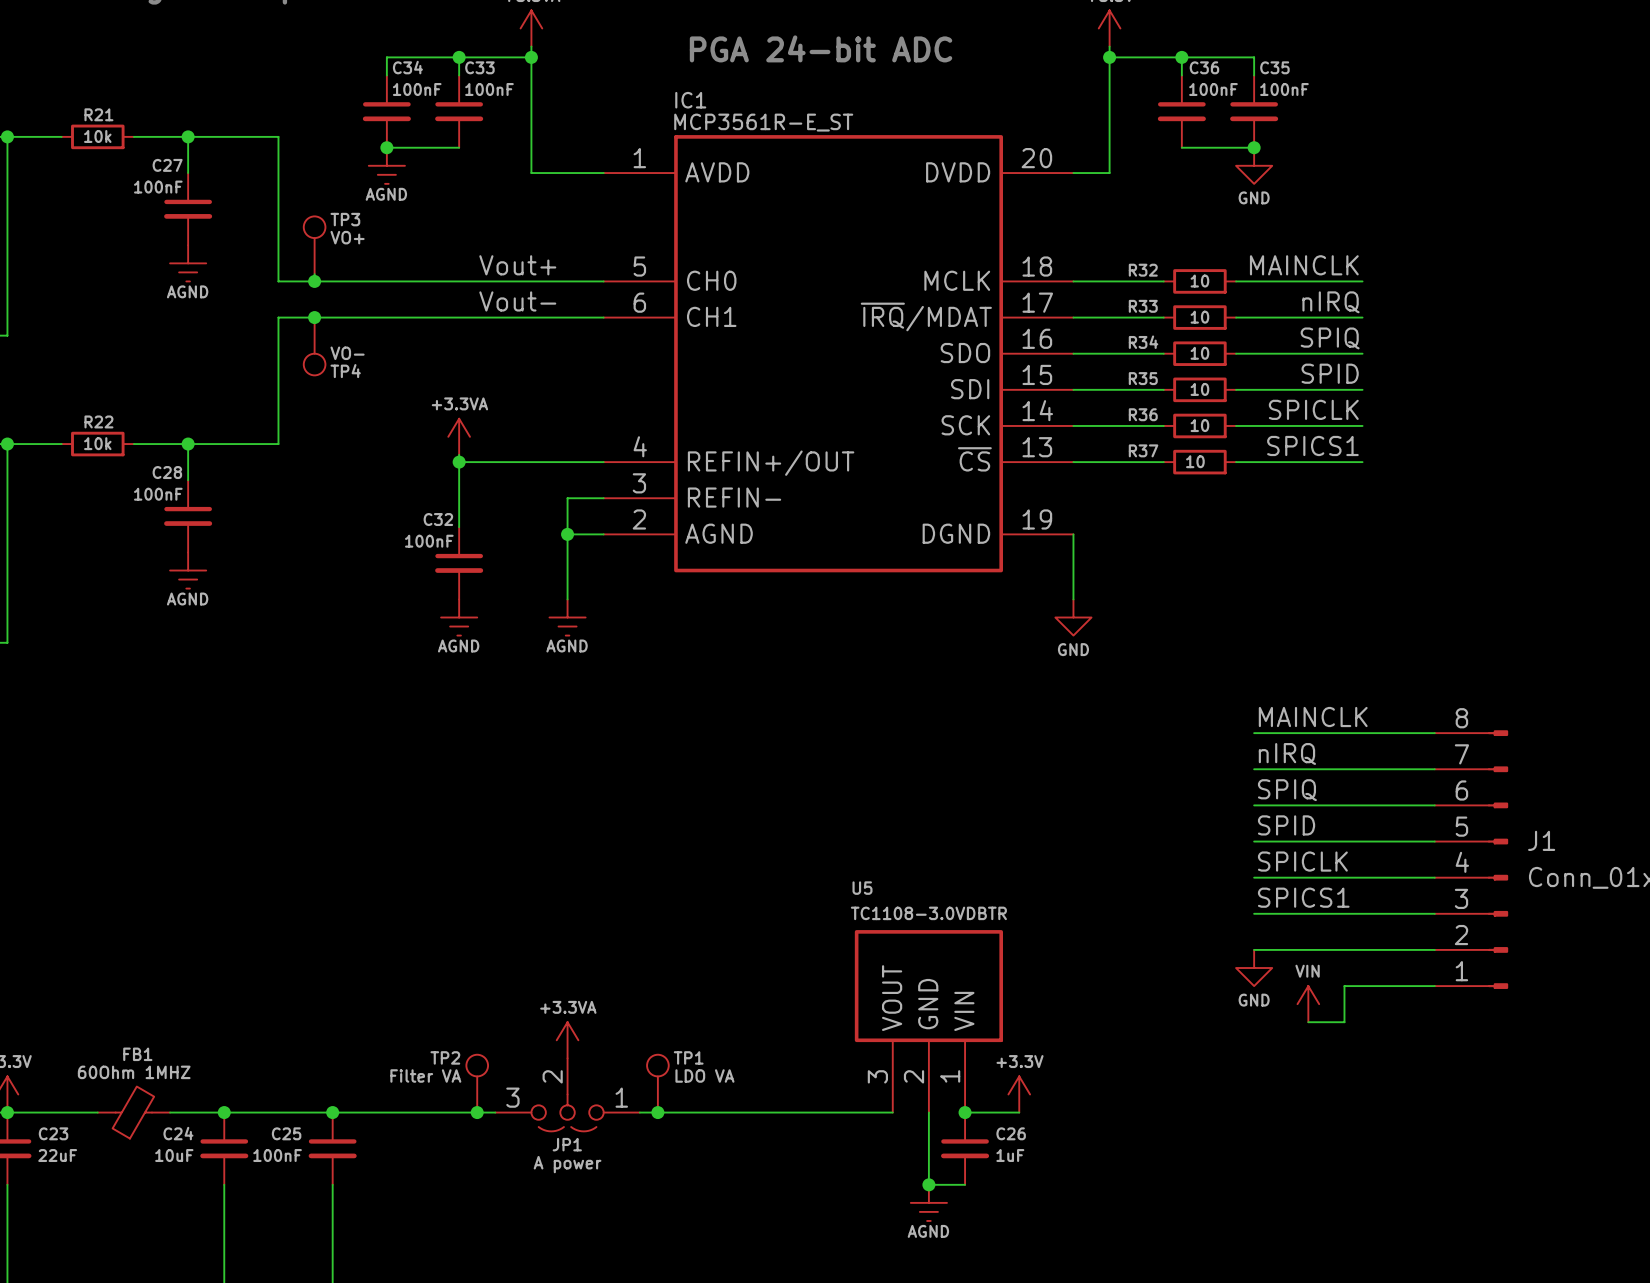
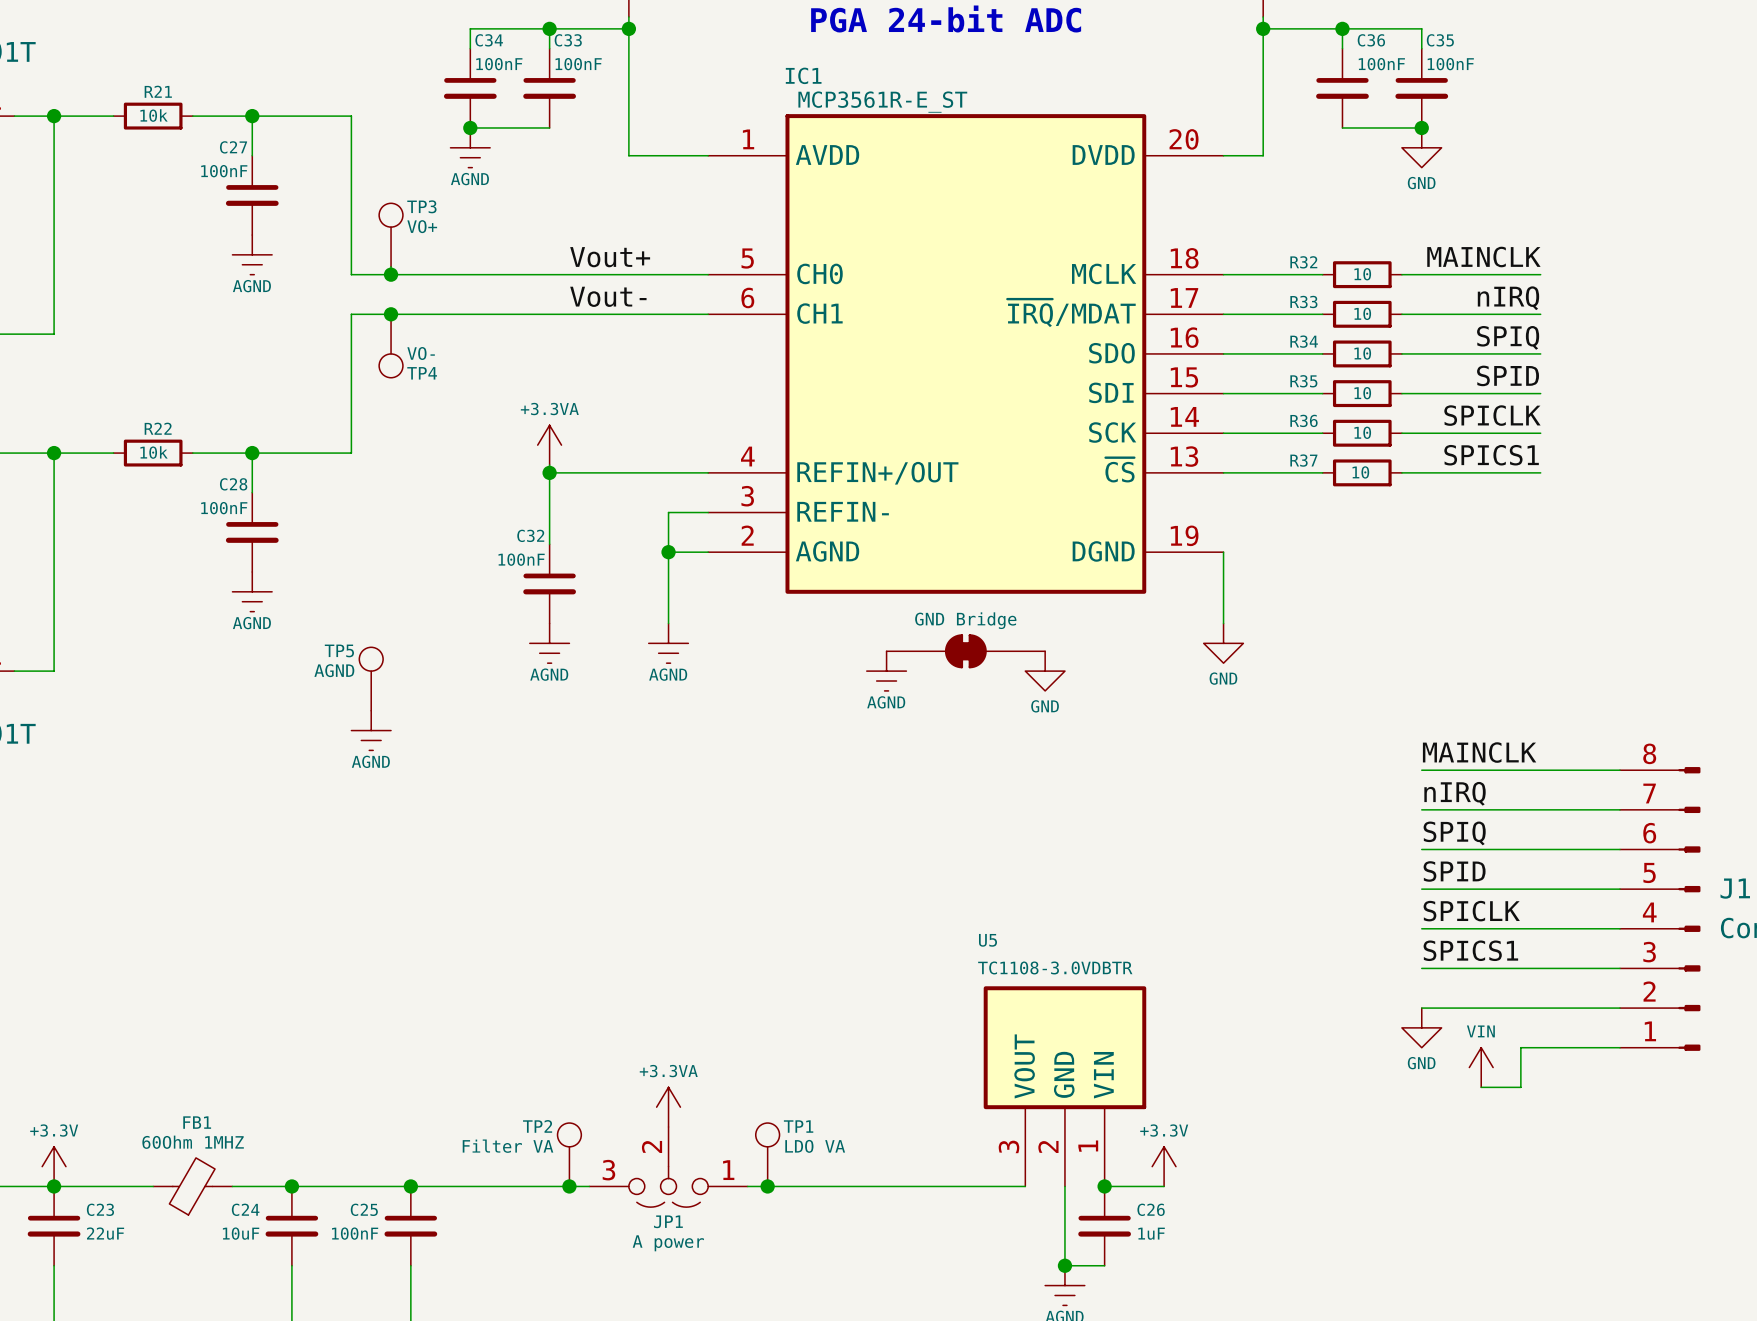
part: none -> GND Bridge (965, 651)
power symbol: none -> AGND (886, 671)
power symbol: none -> GND (1045, 671)
TP5: none -> AGND (371, 679)
power symbol: none -> AGND (371, 730)

